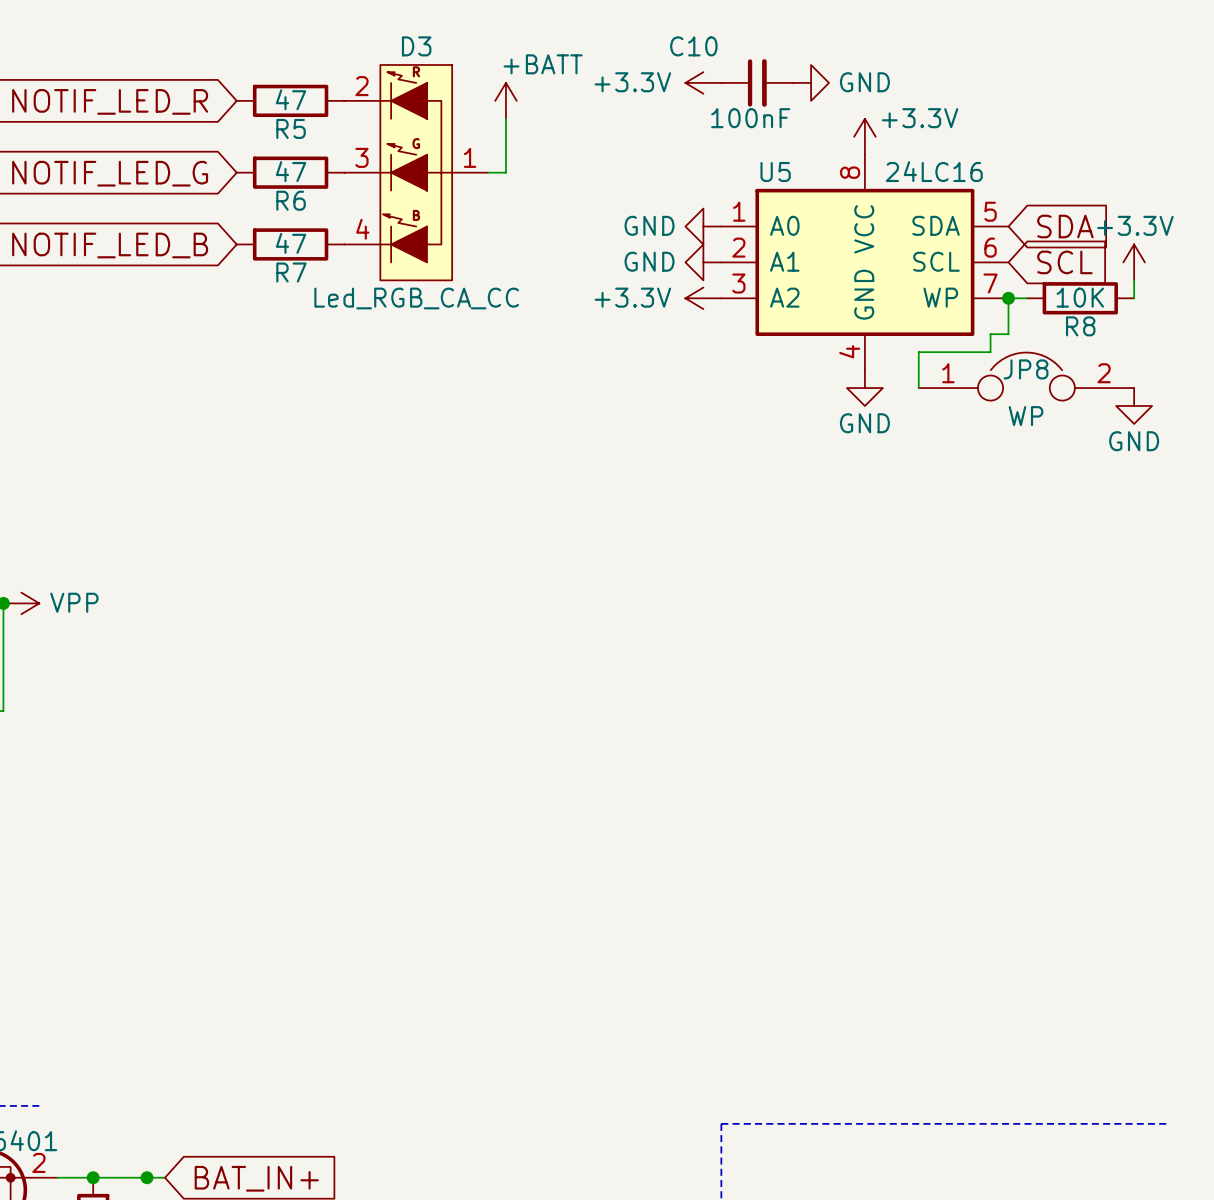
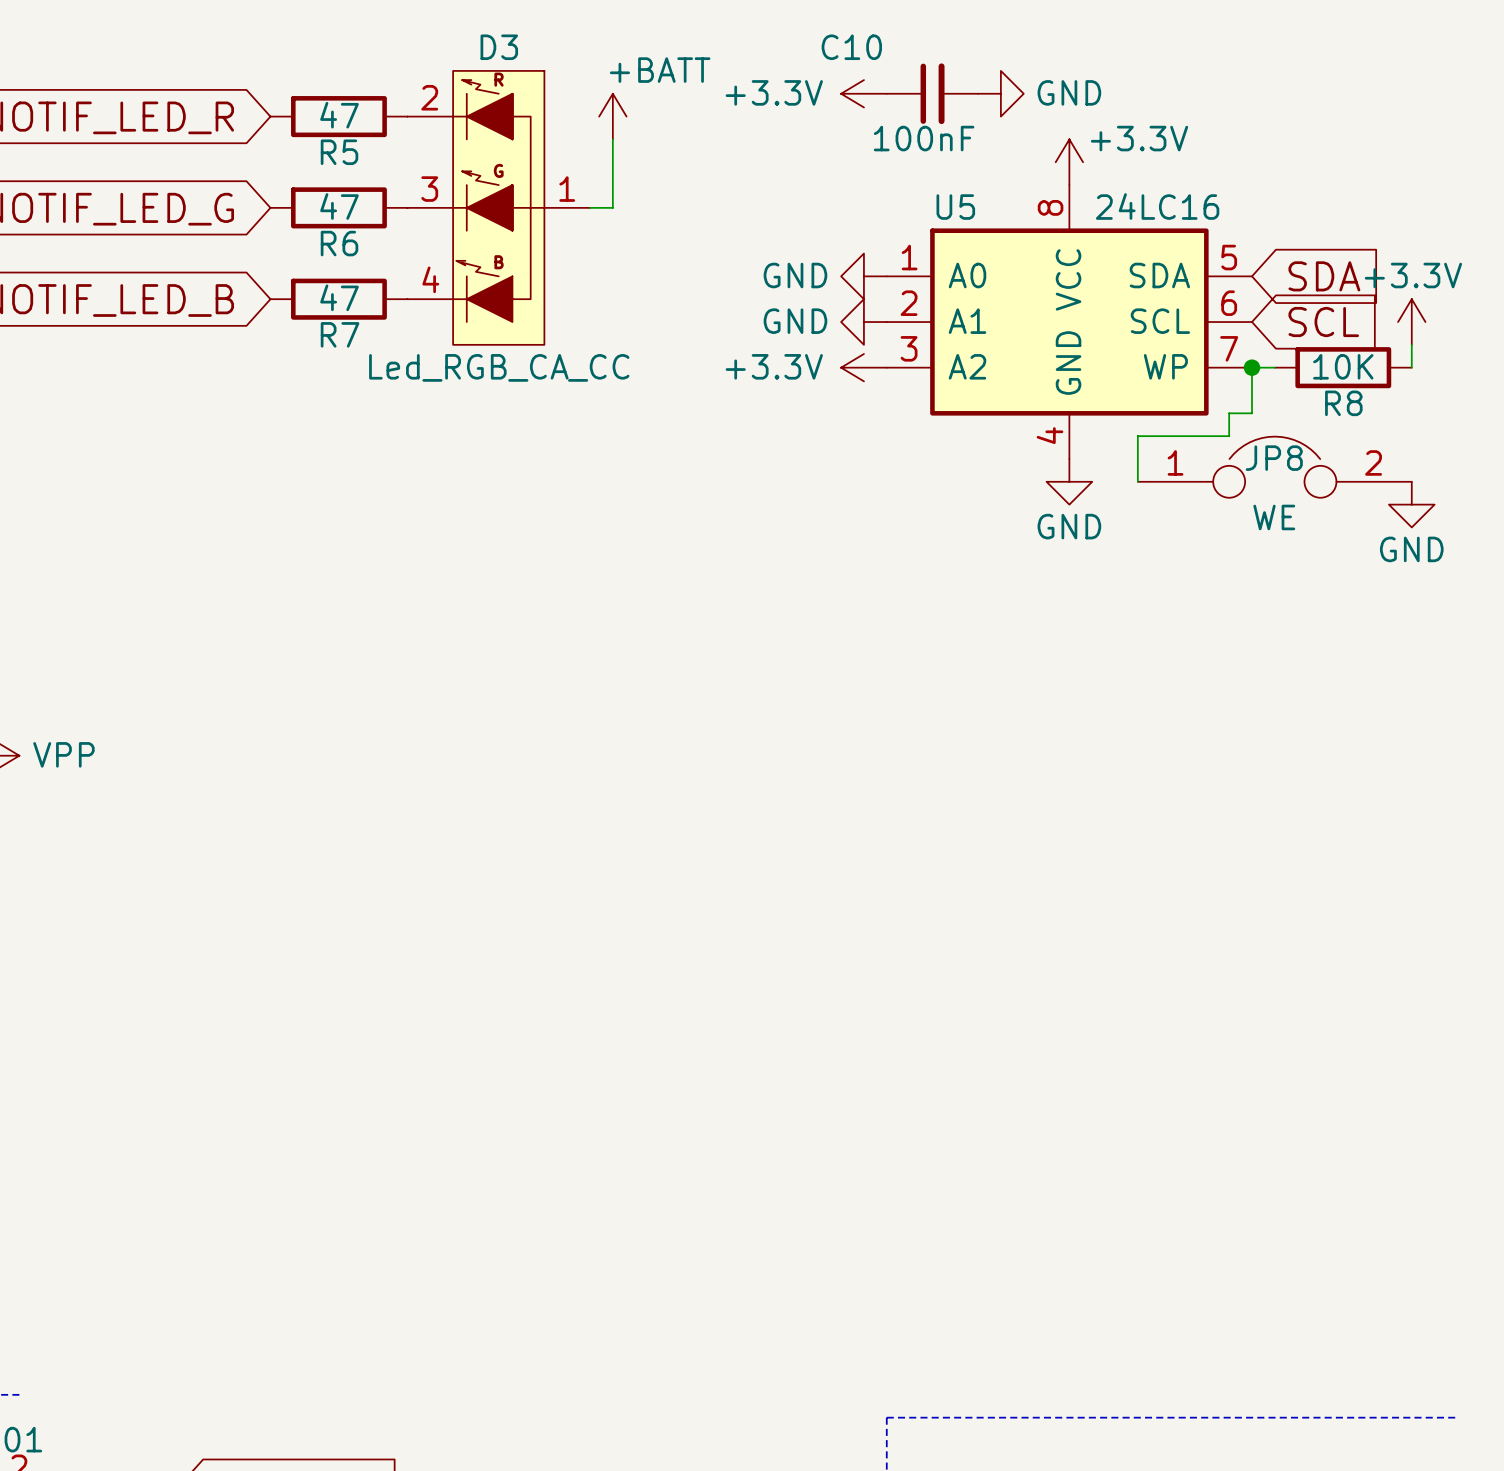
JP8 value: WP (1026, 416) -> WE (1274, 517)

